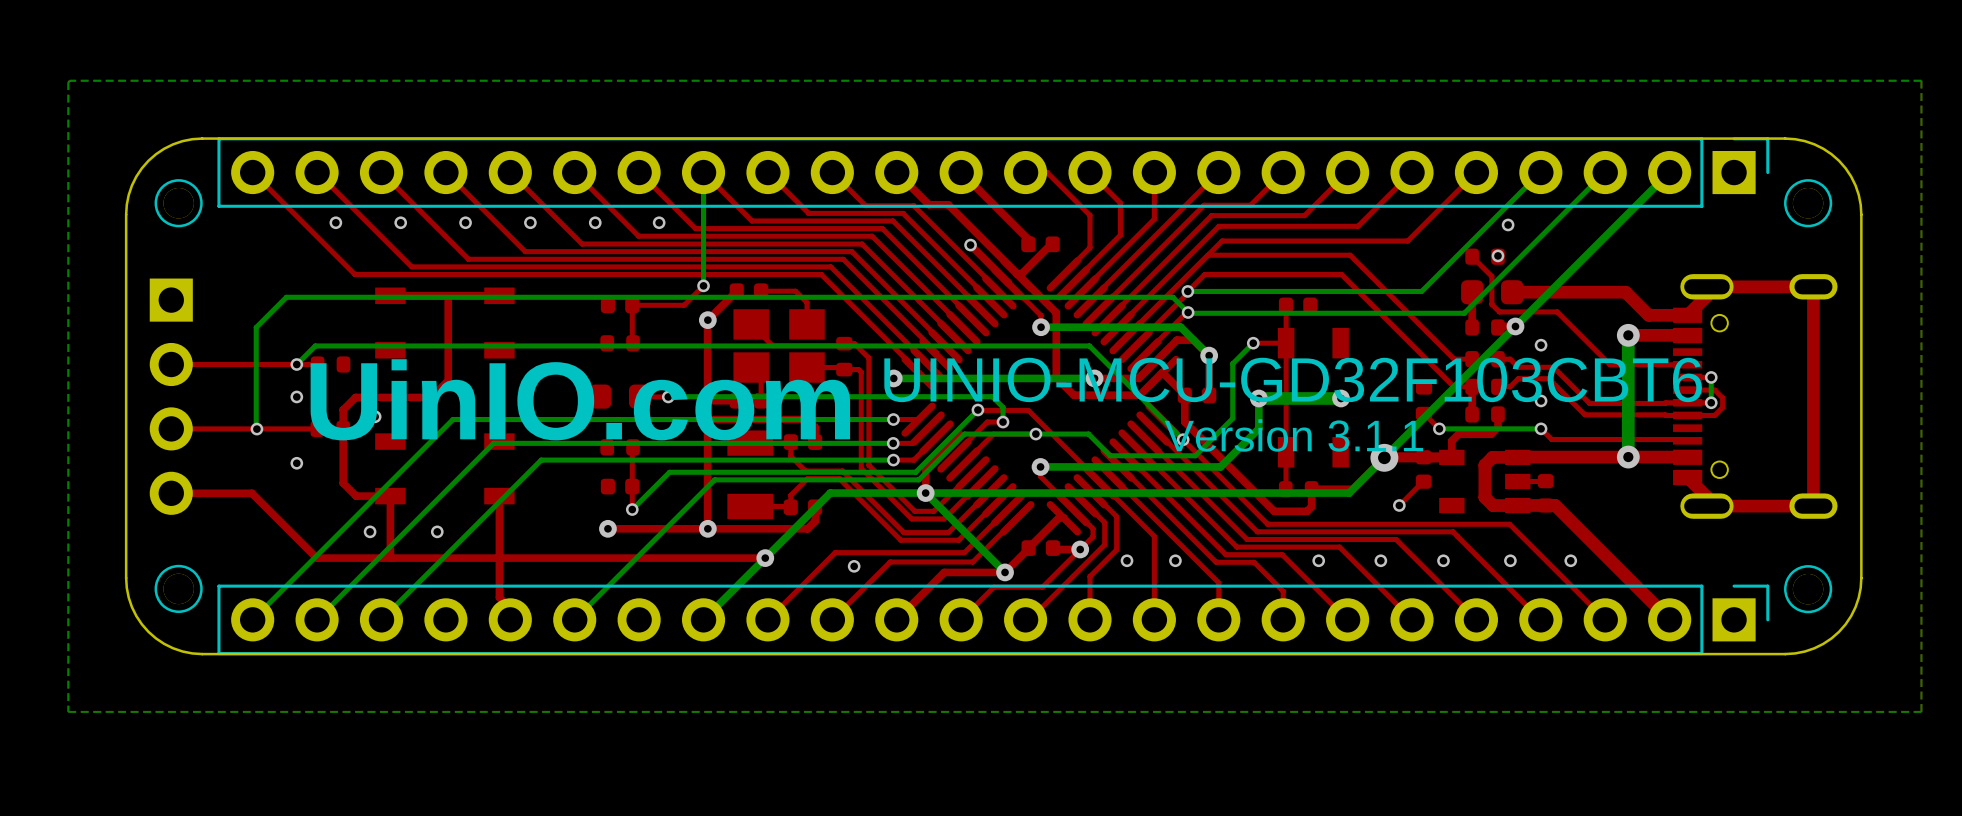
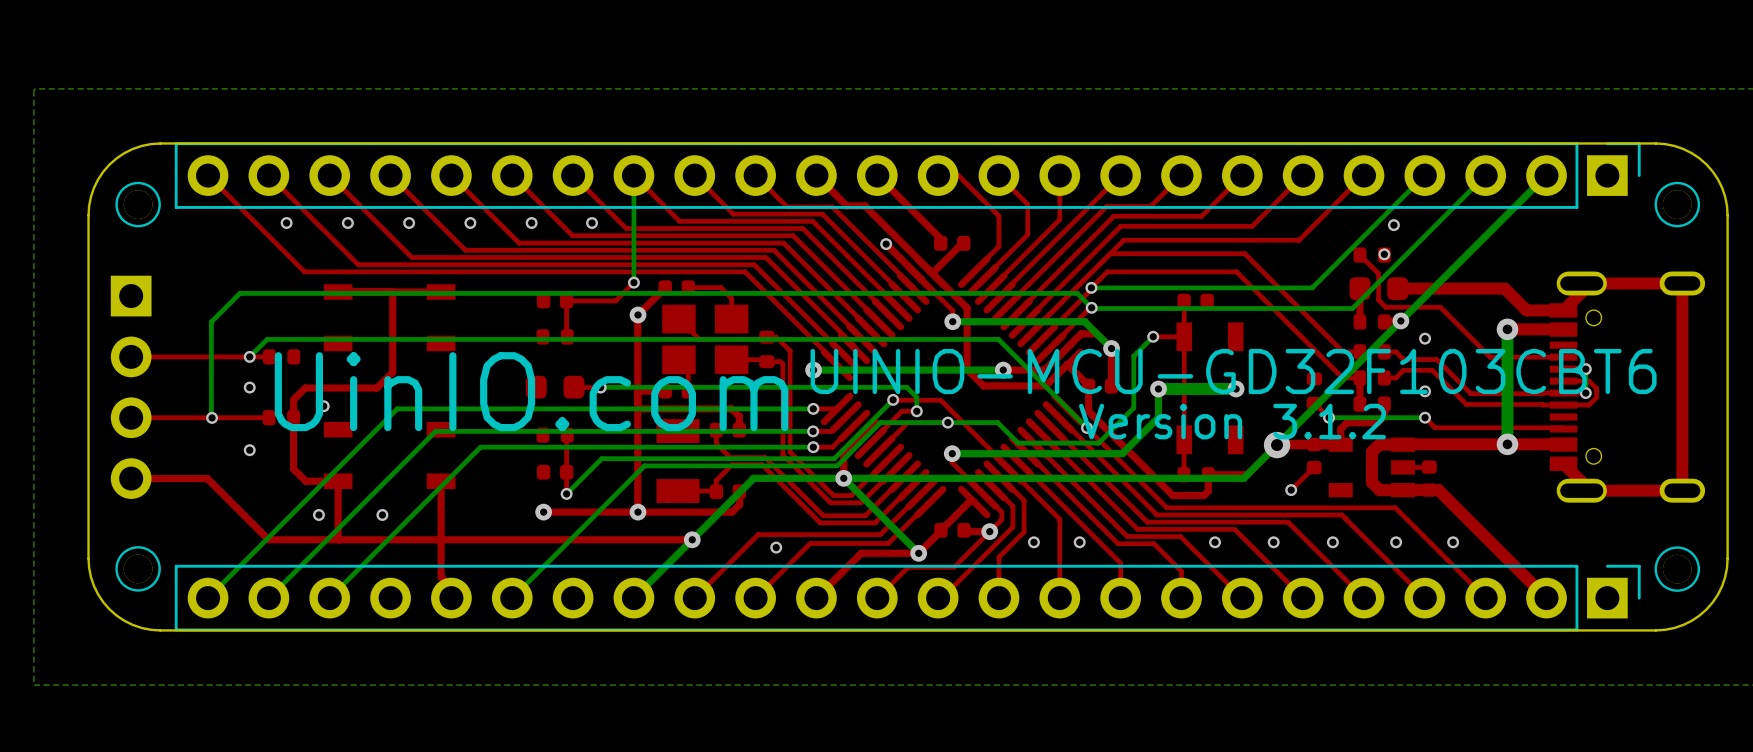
text: Version 3.1.1 (1293, 435) -> Version 3.1.2 (1232, 421)

